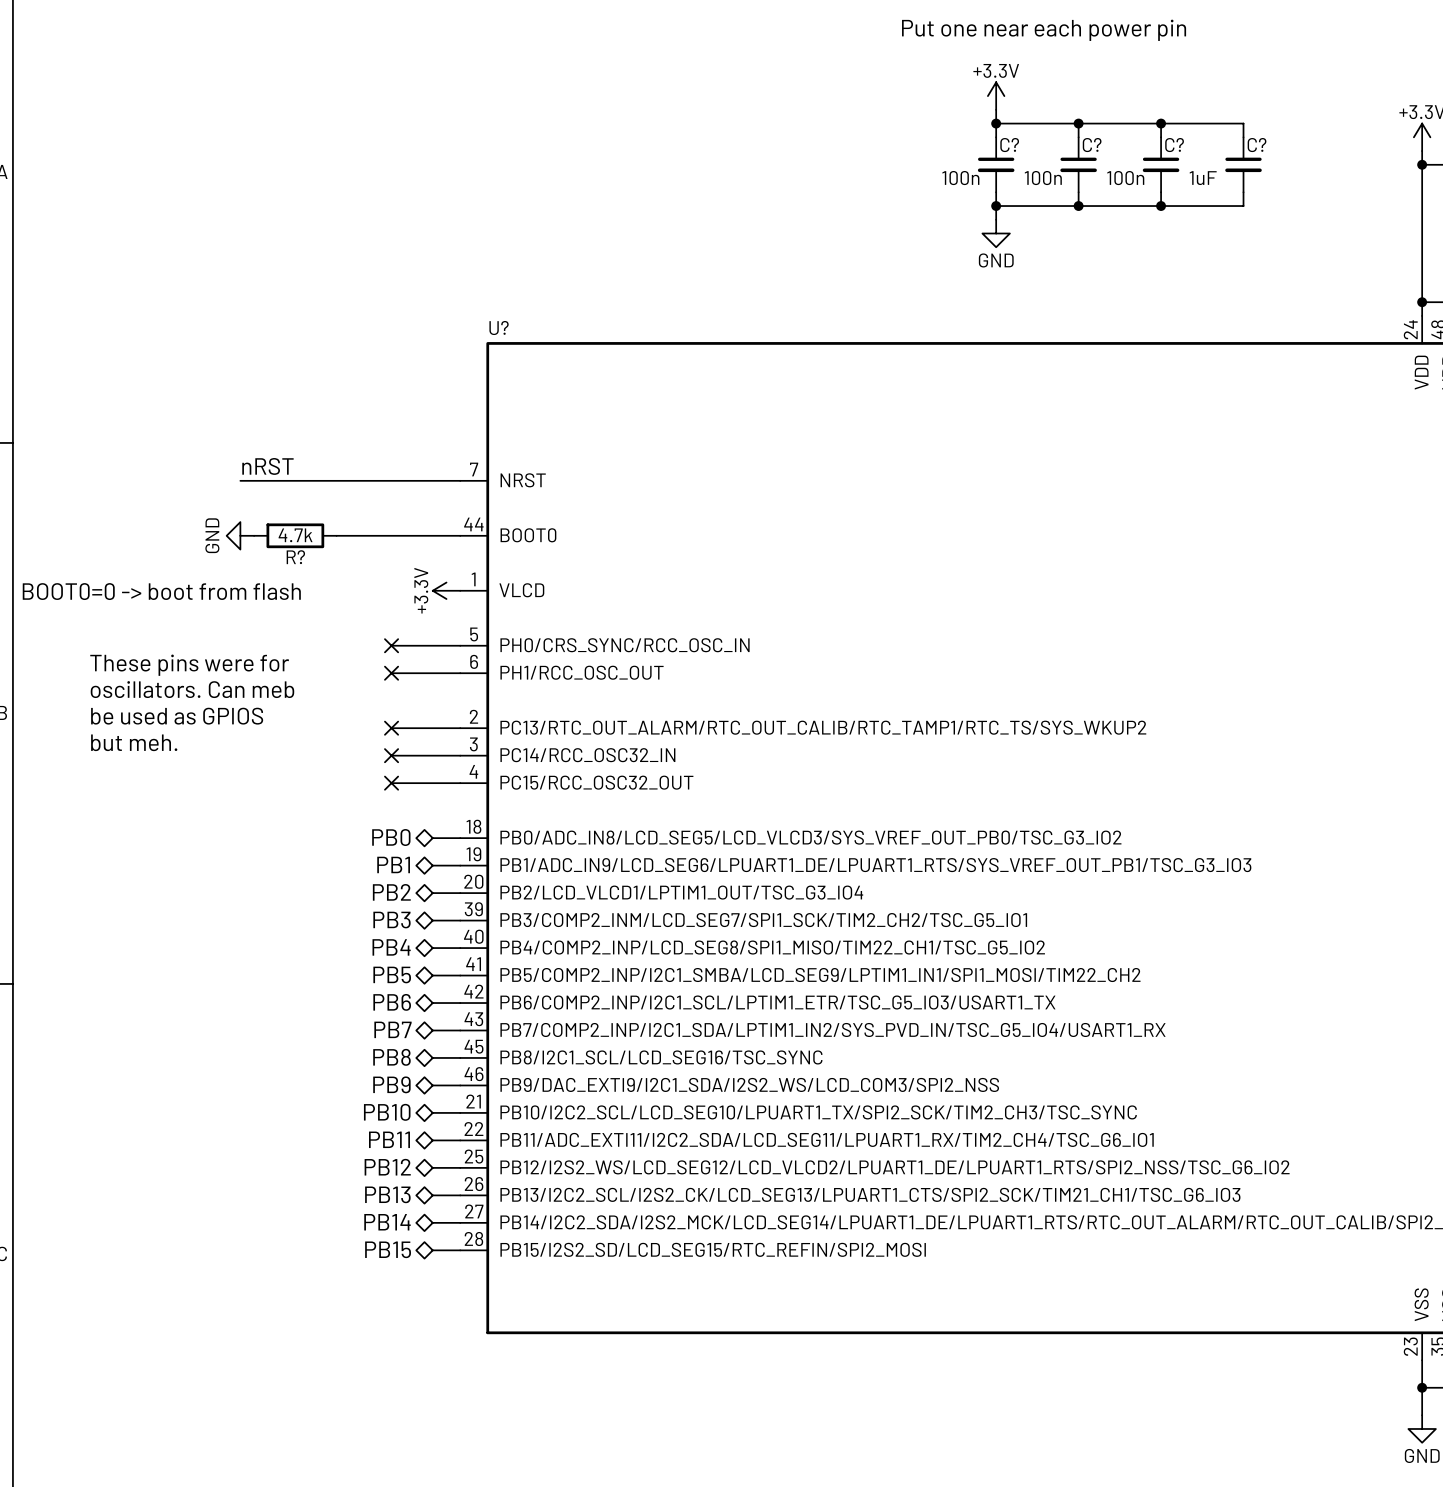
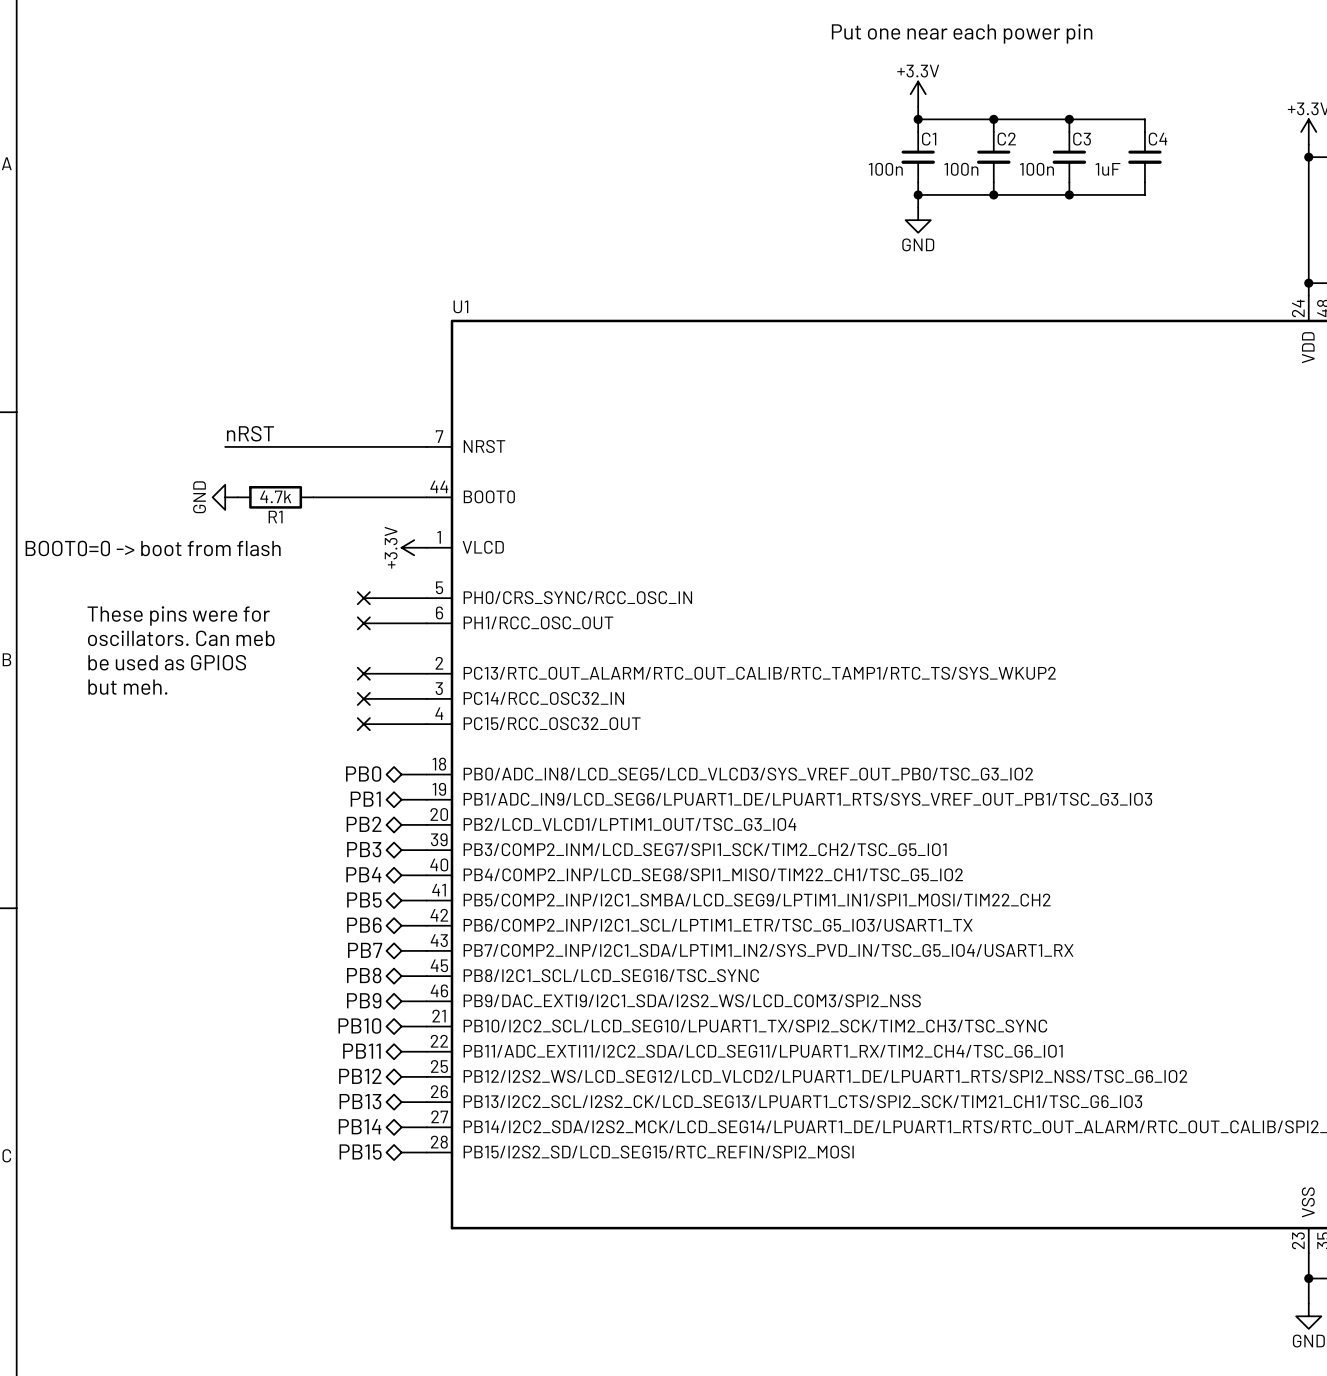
C? name: C? (1009, 145) -> C1 (929, 139)
C? name: C? (1092, 145) -> C2 (1006, 139)
C? name: C? (1174, 145) -> C3 (1082, 139)
C? name: C? (1257, 145) -> C4 (1158, 139)
U? name: U? (499, 327) -> U1 (460, 306)
R? name: R? (295, 557) -> R1 (275, 517)

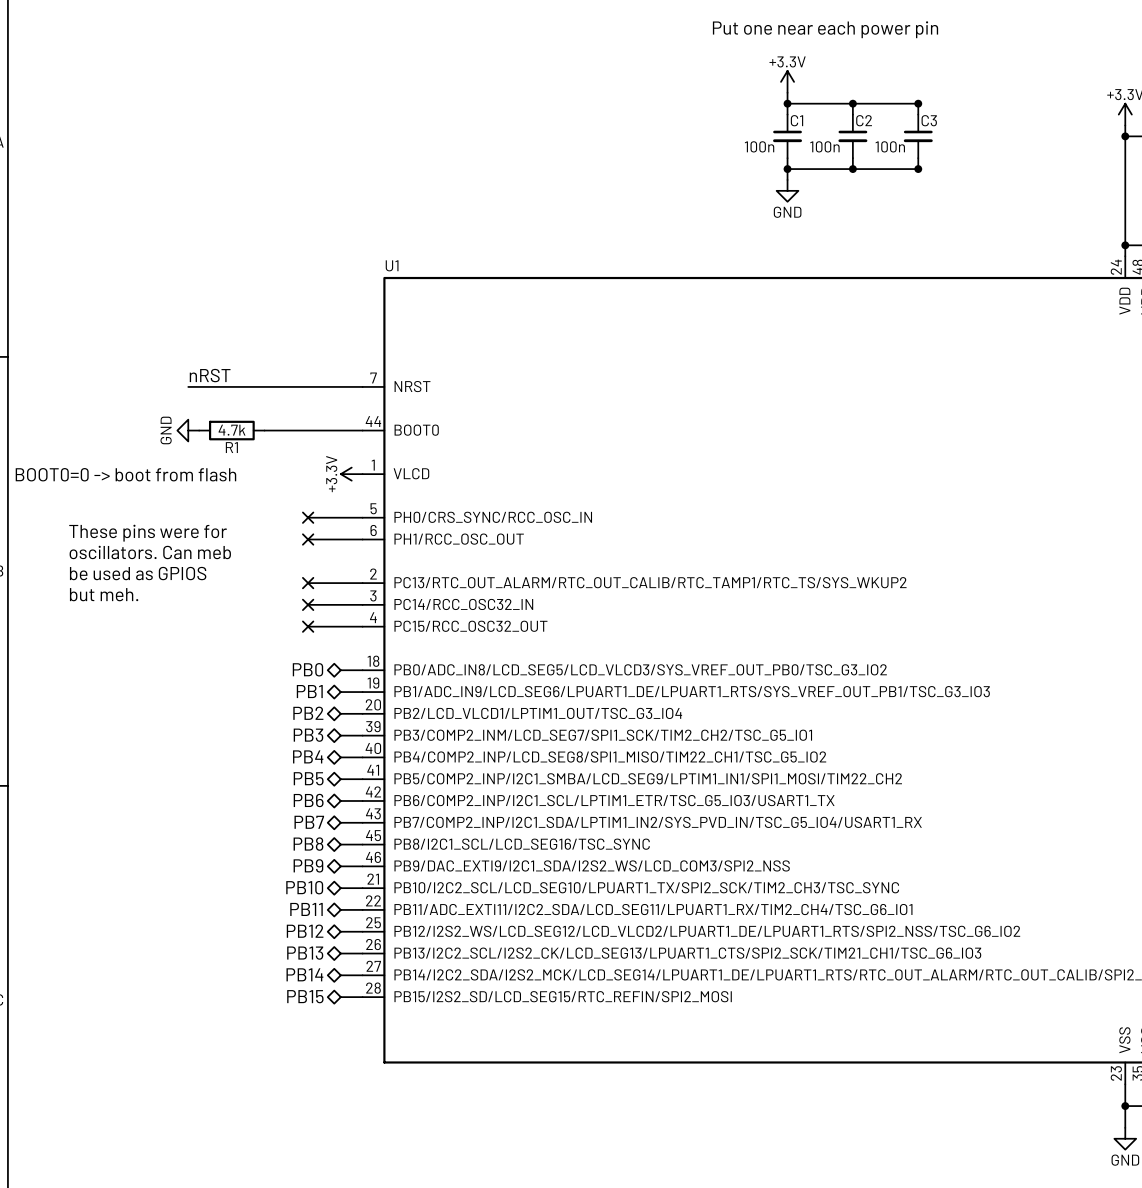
wire: (1069, 119) (1144, 119) (1144, 131) -> none
C4: 1uF (1144, 157) -> none
wire: (1144, 182) (1144, 194) (1069, 194) -> none

